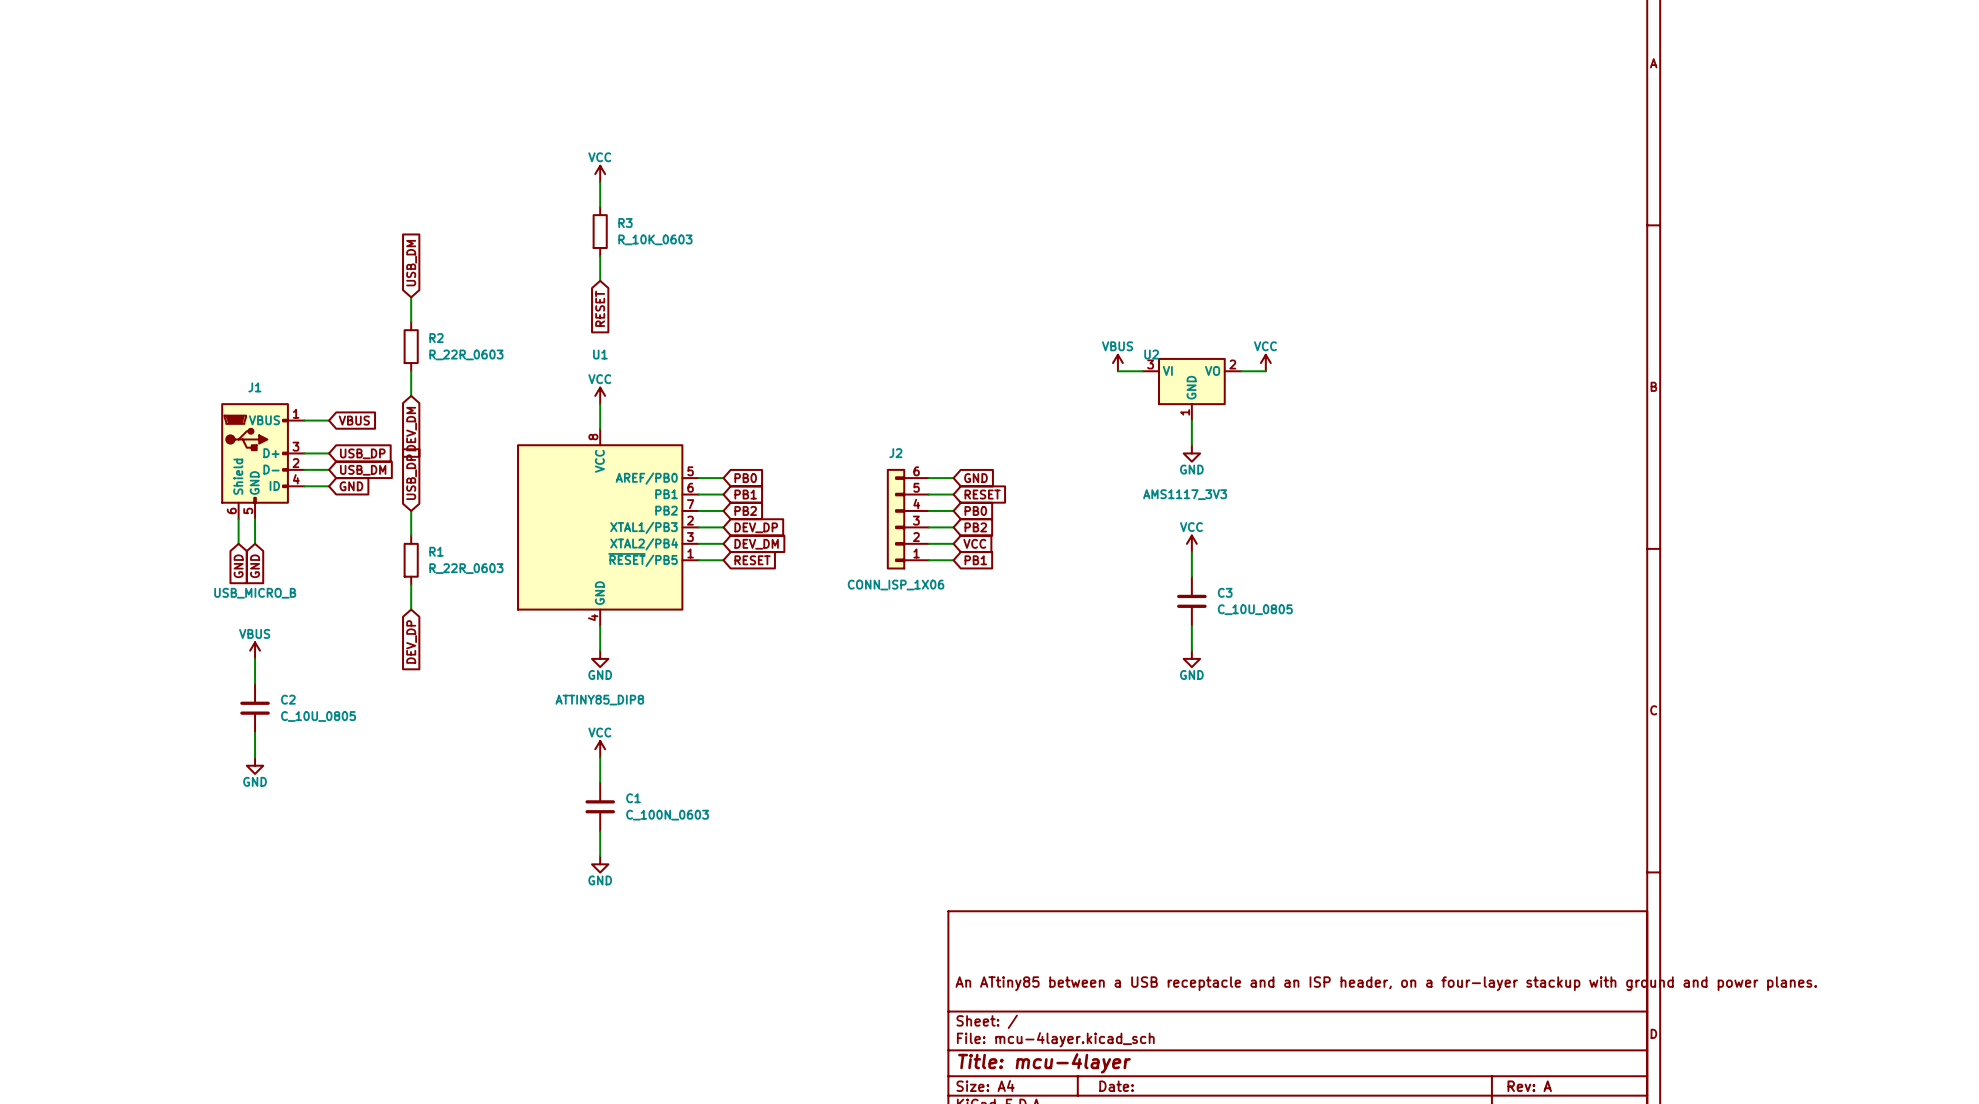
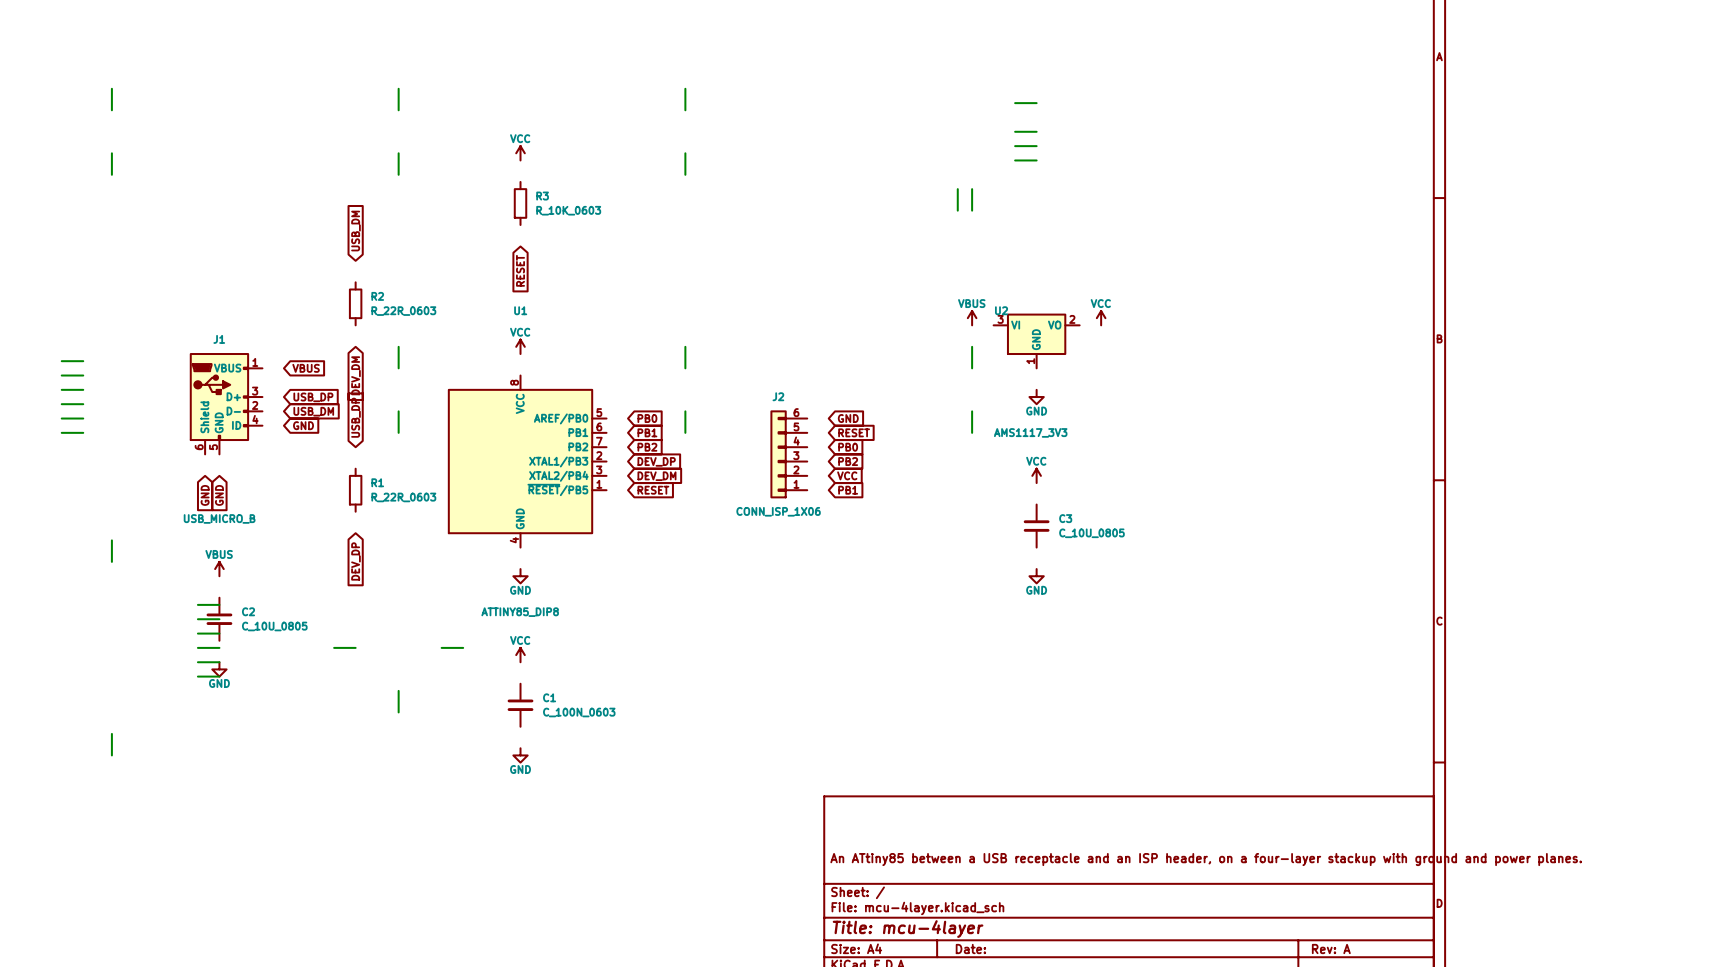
wire: none -> (111, 88) (111, 110)
wire: none -> (398, 88) (398, 110)
wire: none -> (685, 88) (685, 110)
wire: none -> (1015, 103) (1036, 103)
wire: none -> (1015, 131) (1036, 131)
wire: none -> (1015, 146) (1036, 146)
wire: none -> (111, 153) (111, 174)
wire: none -> (685, 153) (685, 174)
wire: (600, 182) (600, 206) -> (398, 153) (398, 174)
wire: none -> (1015, 160) (1036, 160)
wire: none -> (957, 189) (957, 210)
wire: none -> (972, 189) (972, 210)
wire: (600, 256) (600, 280) -> none
wire: (411, 297) (411, 321) -> (398, 346) (398, 368)
wire: (411, 371) (411, 395) -> (398, 411) (398, 432)
wire: (1117, 371) (1142, 371) -> none
wire: (1241, 371) (1265, 371) -> none
wire: none -> (685, 346) (685, 368)
wire: (600, 404) (600, 428) -> none
wire: none -> (61, 361) (83, 361)
wire: (304, 420) (329, 420) -> none
wire: (1191, 420) (1191, 445) -> (972, 346) (972, 368)
wire: none -> (61, 375) (83, 375)
wire: none -> (61, 389) (83, 389)
wire: (304, 453) (329, 453) -> none
wire: none -> (61, 404) (83, 404)
wire: (304, 469) (329, 469) -> none
wire: none -> (685, 411) (685, 432)
wire: none -> (61, 418) (83, 418)
wire: (698, 478) (723, 478) -> none
wire: (928, 478) (953, 478) -> none
wire: (304, 486) (329, 486) -> none
wire: none -> (61, 432) (83, 432)
wire: (698, 494) (723, 494) -> none
wire: (928, 494) (953, 494) -> none
wire: (411, 510) (411, 535) -> none
wire: (698, 510) (723, 510) -> none
wire: (928, 510) (953, 510) -> none
wire: (238, 519) (238, 543) -> none
wire: (255, 519) (255, 543) -> none
wire: (698, 527) (723, 527) -> none
wire: (928, 527) (953, 527) -> none
wire: (698, 543) (723, 543) -> none
wire: (928, 543) (953, 543) -> none
wire: (1191, 552) (1191, 576) -> (972, 411) (972, 432)
wire: (698, 560) (723, 560) -> none
wire: (928, 560) (953, 560) -> none
wire: (411, 584) (411, 609) -> none
wire: (600, 626) (600, 650) -> none
wire: (1191, 626) (1191, 650) -> none
wire: (255, 658) (255, 683) -> (111, 540) (111, 561)
wire: none -> (197, 604) (219, 604)
wire: none -> (197, 619) (219, 619)
wire: none -> (197, 633) (219, 633)
wire: (255, 732) (255, 757) -> (197, 662) (219, 662)
wire: none -> (197, 647) (219, 647)
wire: none -> (334, 647) (355, 647)
wire: none -> (441, 647) (463, 647)
wire: (600, 757) (600, 782) -> (398, 690) (398, 712)
wire: none -> (197, 676) (219, 676)
wire: (600, 831) (600, 856) -> none
wire: none -> (111, 733) (111, 755)

